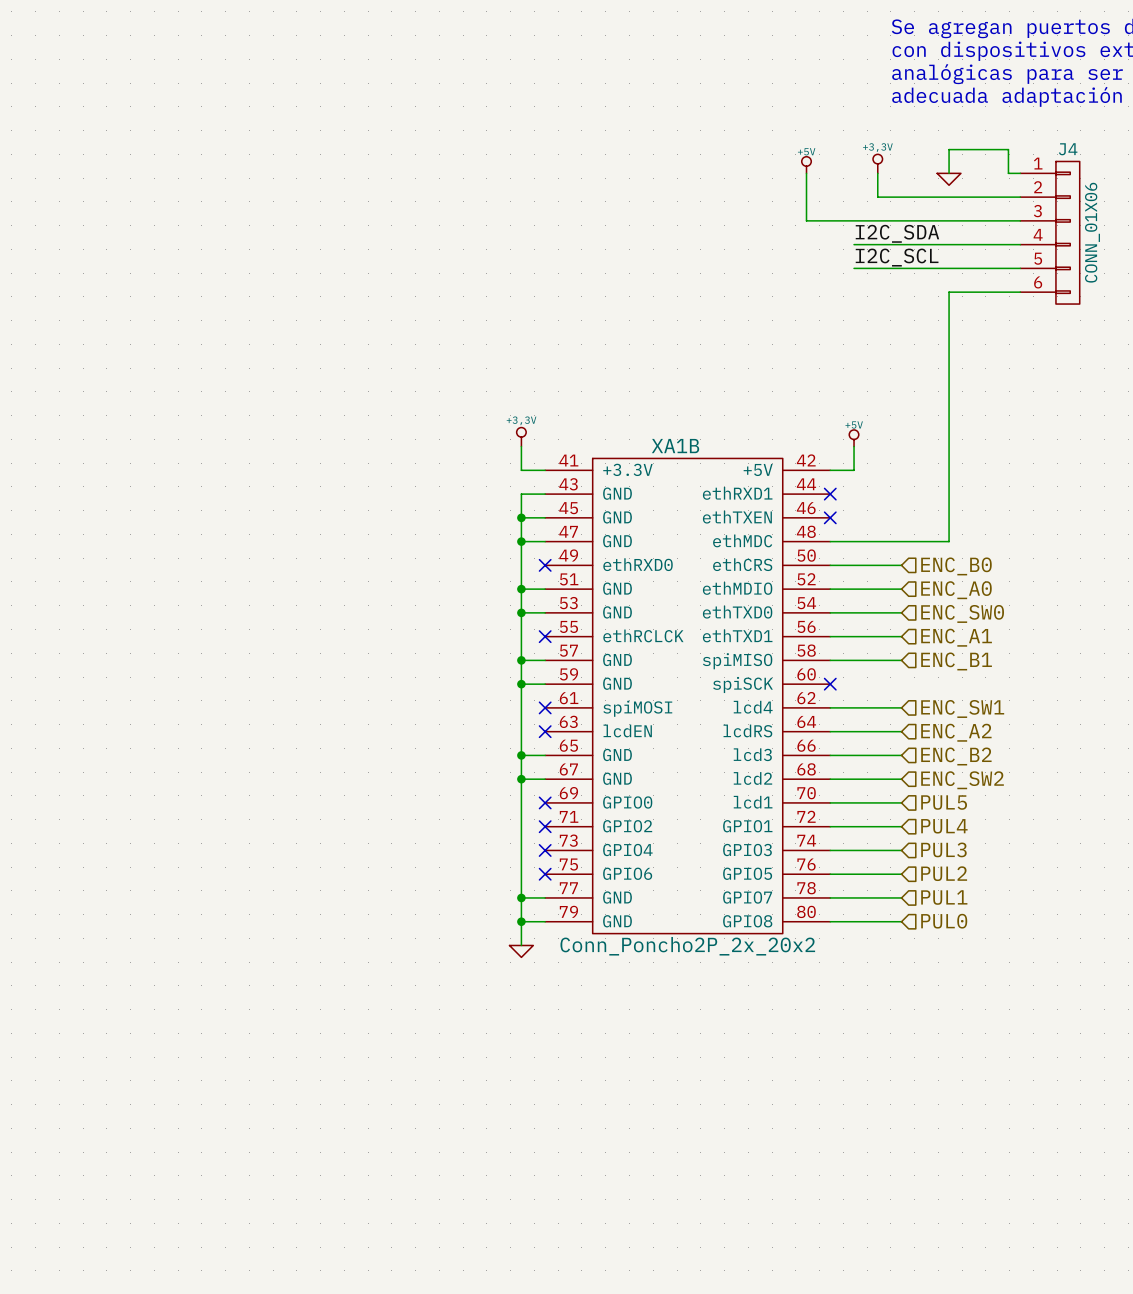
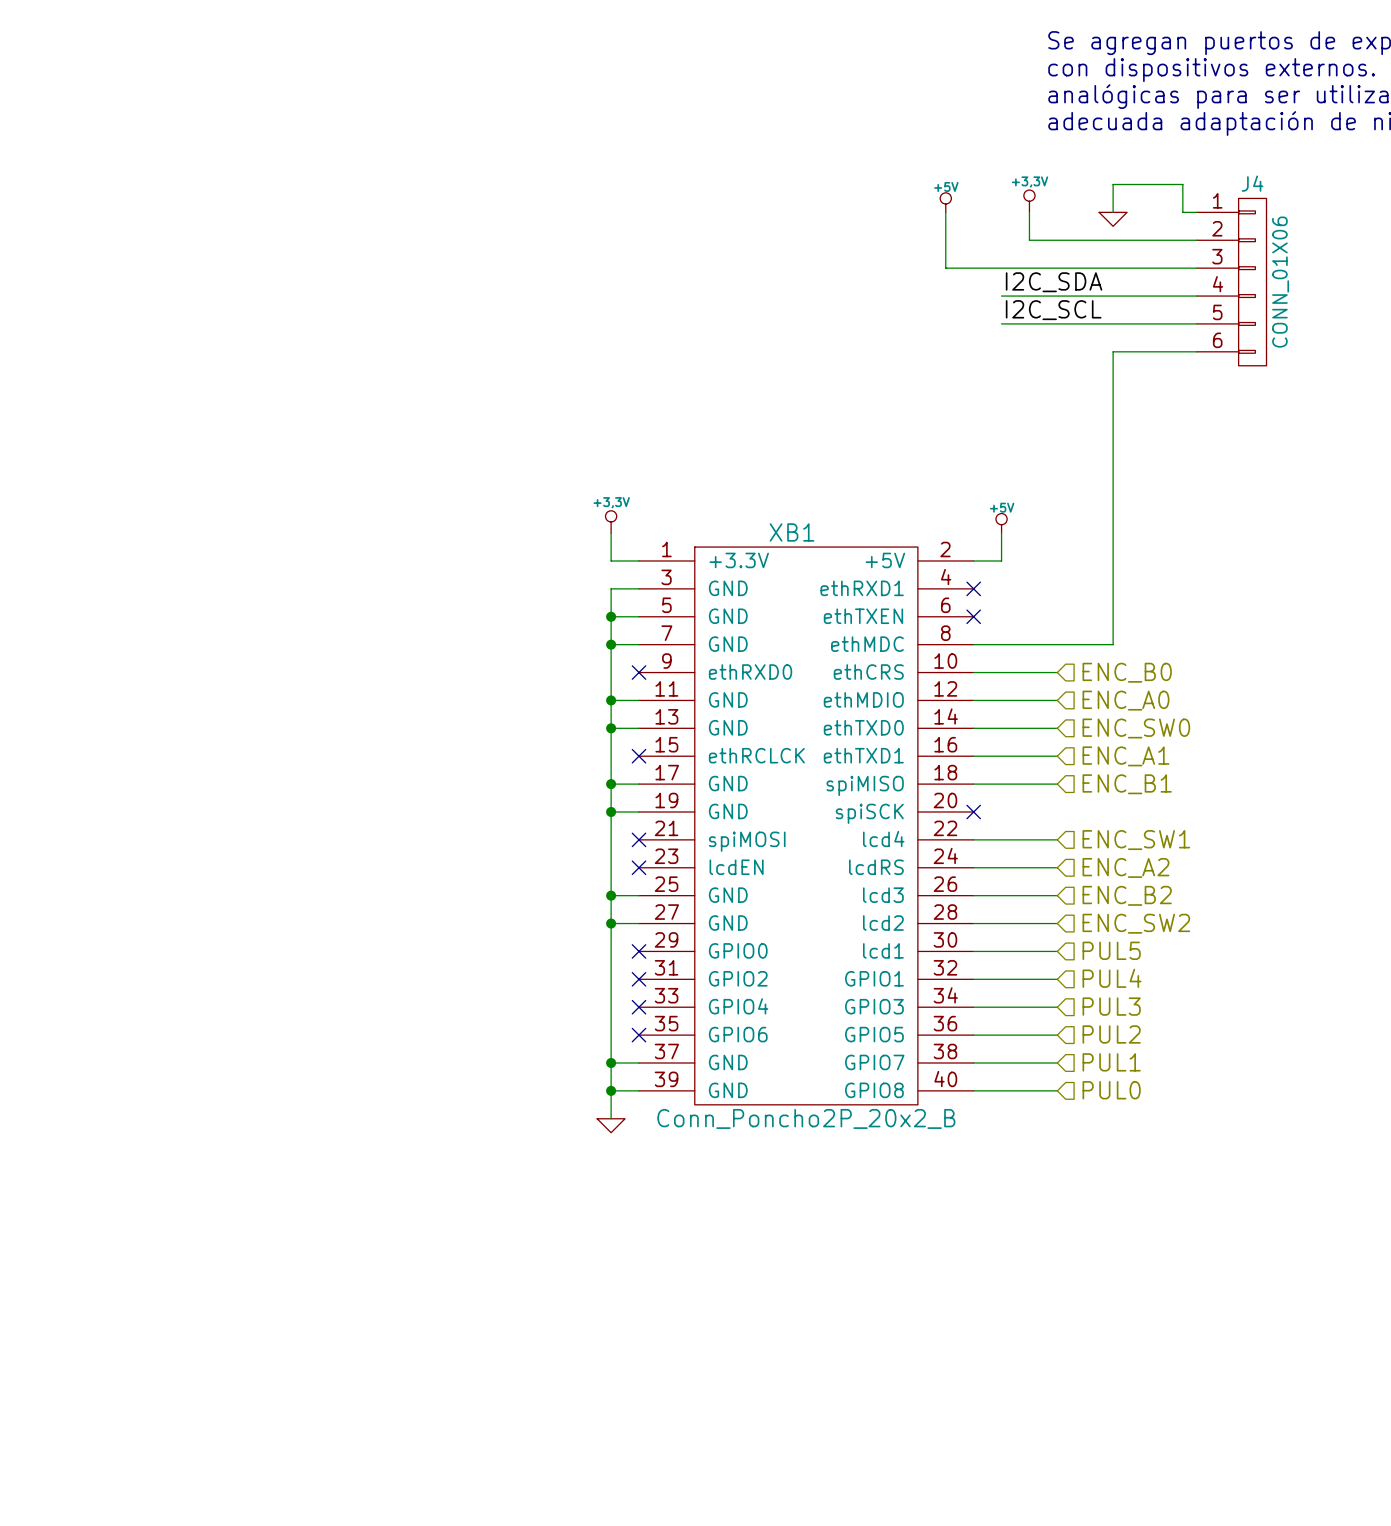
XA1B name: XA1B (675, 446) -> XB1 (791, 532)
XA1B symbol: [545, 458, 831, 934] -> [639, 547, 974, 1105]
XA1B value: Conn_Poncho2P_2x_20x2 (687, 946) -> Conn_Poncho2P_20x2_B (806, 1118)

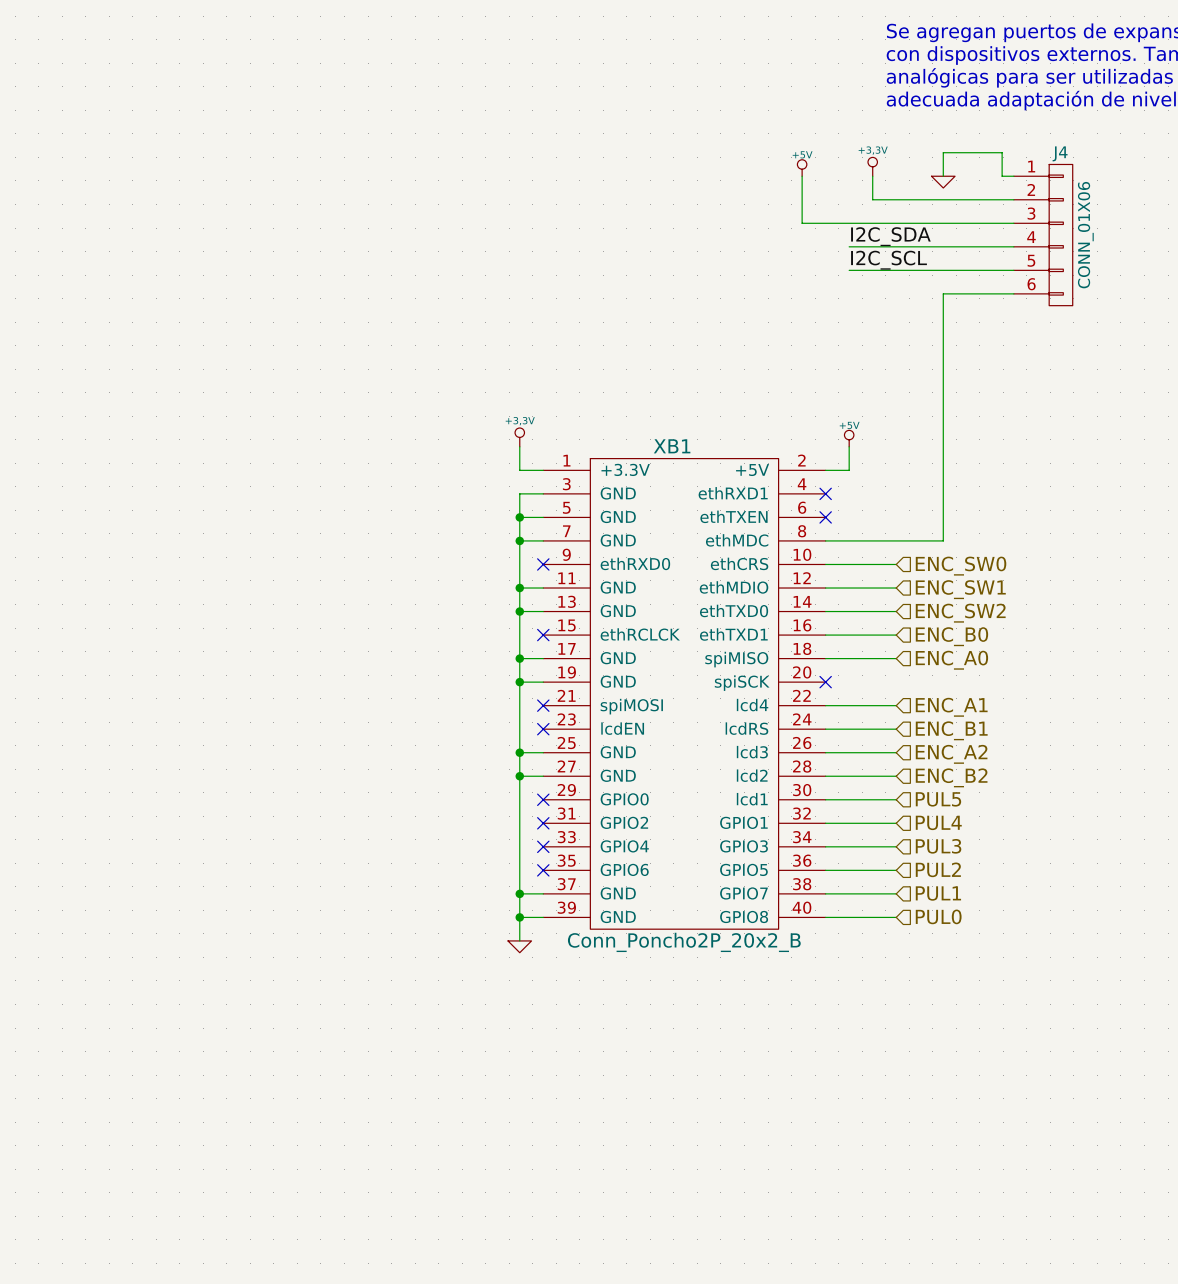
hierarchical label: ENC_B0 (1127, 672) -> ENC_SW0 (961, 566)
hierarchical label: ENC_A0 (1125, 700) -> ENC_SW1 (960, 589)
hierarchical label: ENC_SW0 (1136, 728) -> ENC_SW2 (960, 613)
hierarchical label: ENC_A1 (1125, 756) -> ENC_B0 (951, 636)
hierarchical label: ENC_B1 (1127, 784) -> ENC_A0 (951, 660)
hierarchical label: ENC_SW1 (1136, 840) -> ENC_A1 (951, 707)
hierarchical label: ENC_A2 (1125, 867) -> ENC_B1 (951, 730)
hierarchical label: ENC_B2 (1127, 895) -> ENC_A2 (951, 754)
hierarchical label: ENC_SW2 (1136, 923) -> ENC_B2 (951, 777)

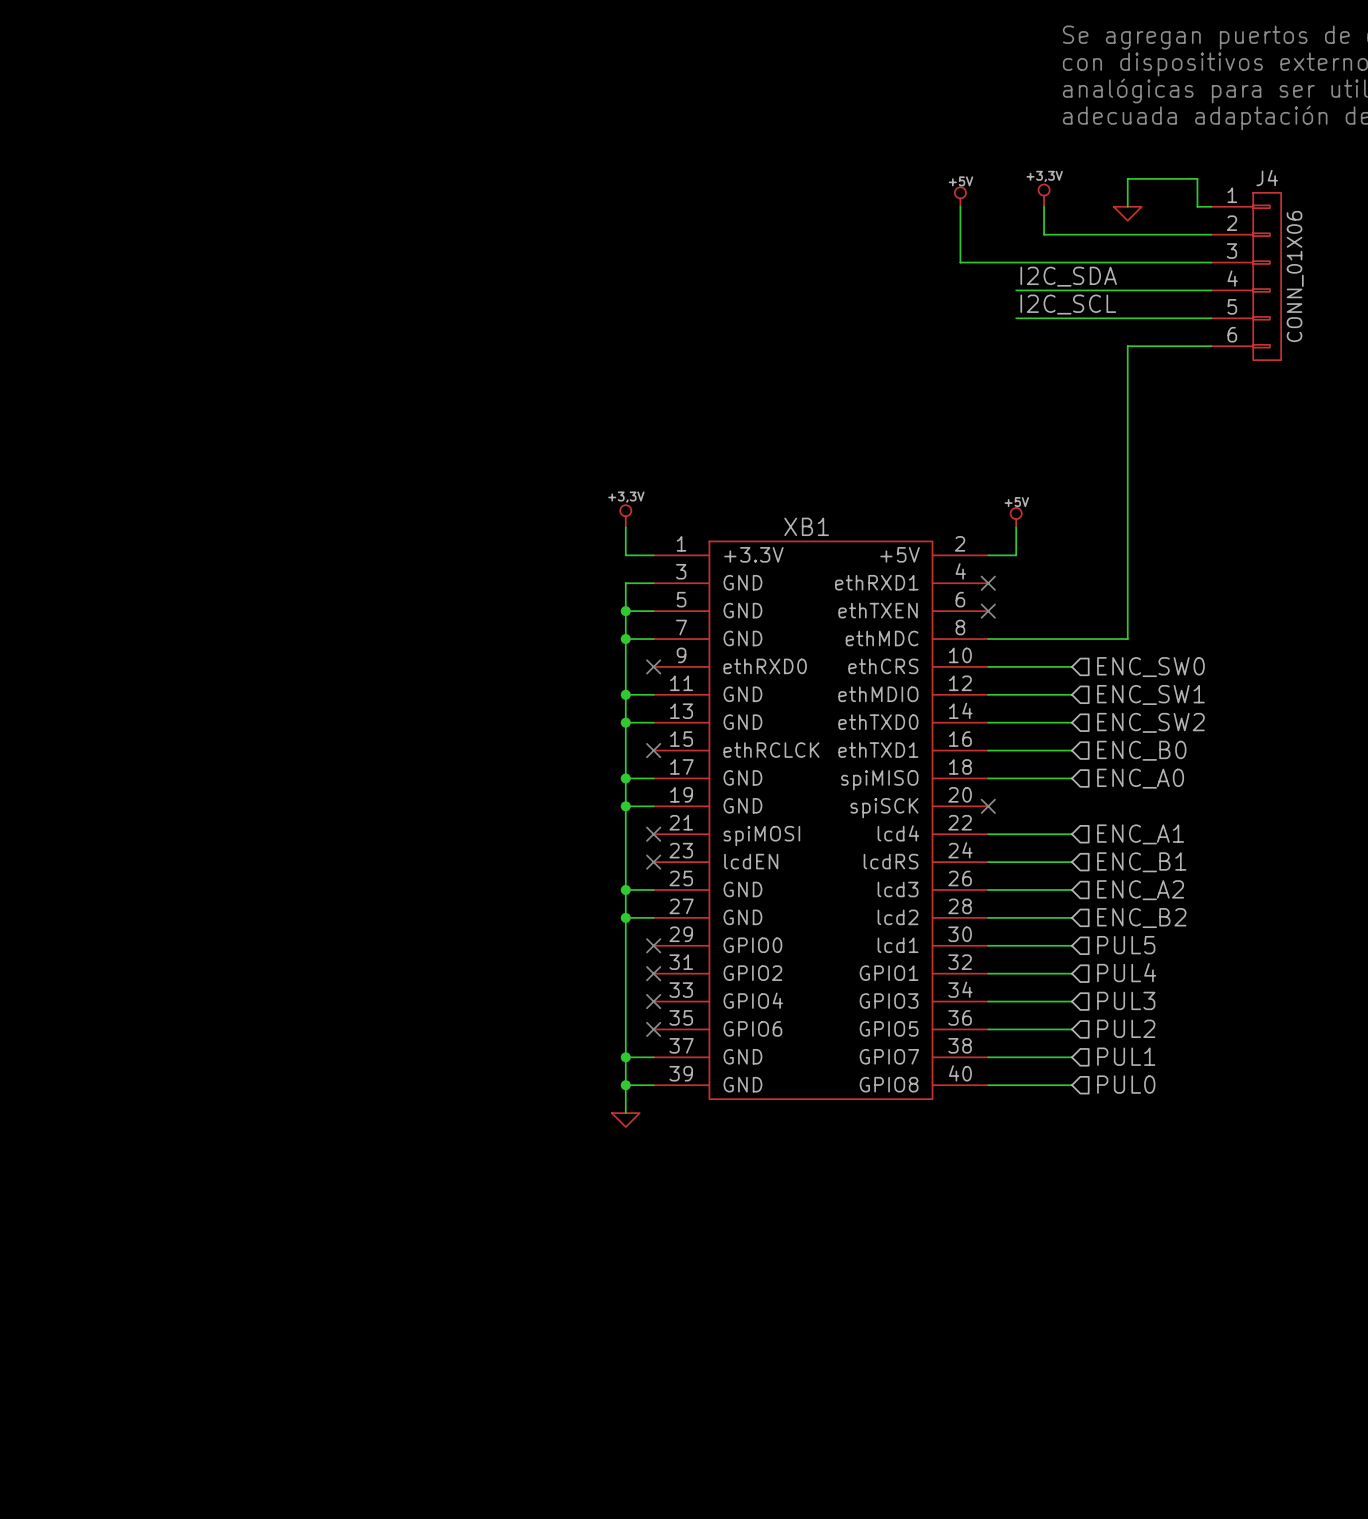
XB1 value: Conn_Poncho2P_20x2_B (684, 942) -> none

